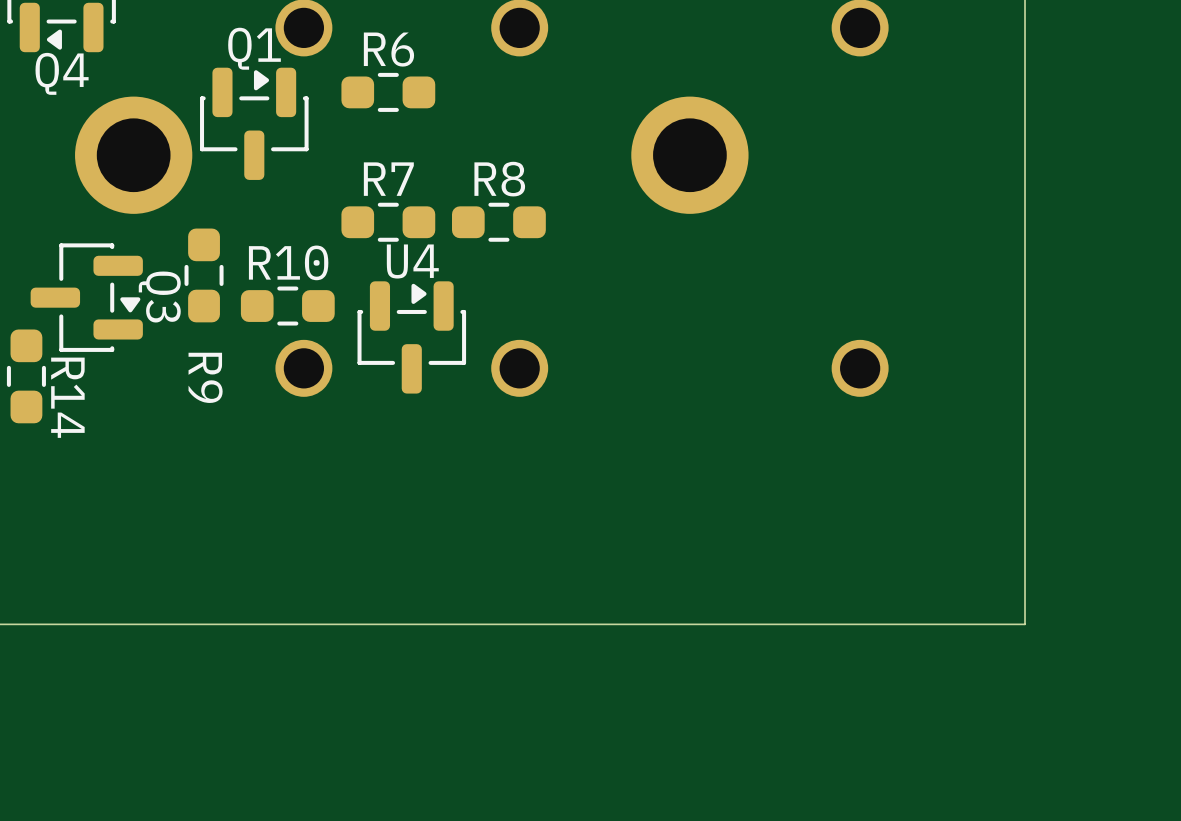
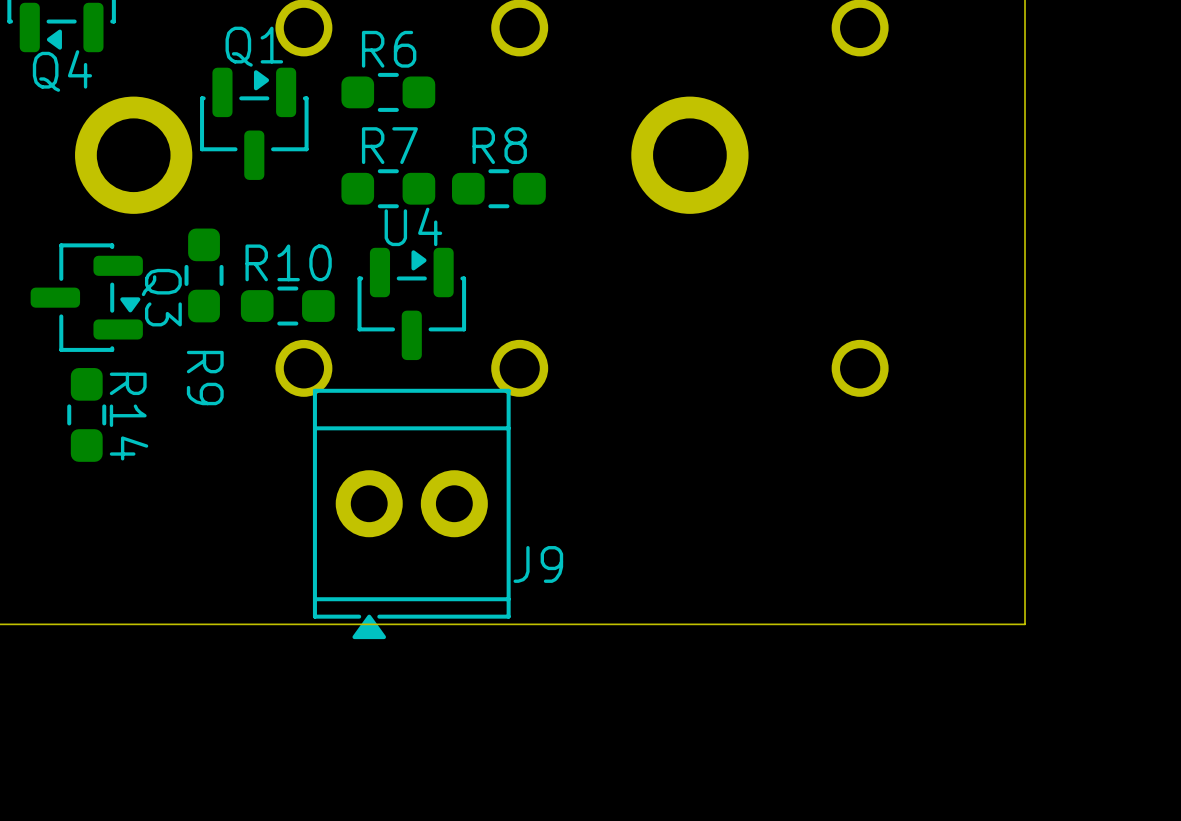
R7 position: (388, 222) -> (388, 188)
R8 position: (498, 222) -> (498, 188)
U4 position: (411, 337) -> (411, 303)
R14 position: (26, 376) -> (86, 414)
R14 name position: R14 (67, 397) -> R14 (129, 416)
J9: none -> (411, 513)

